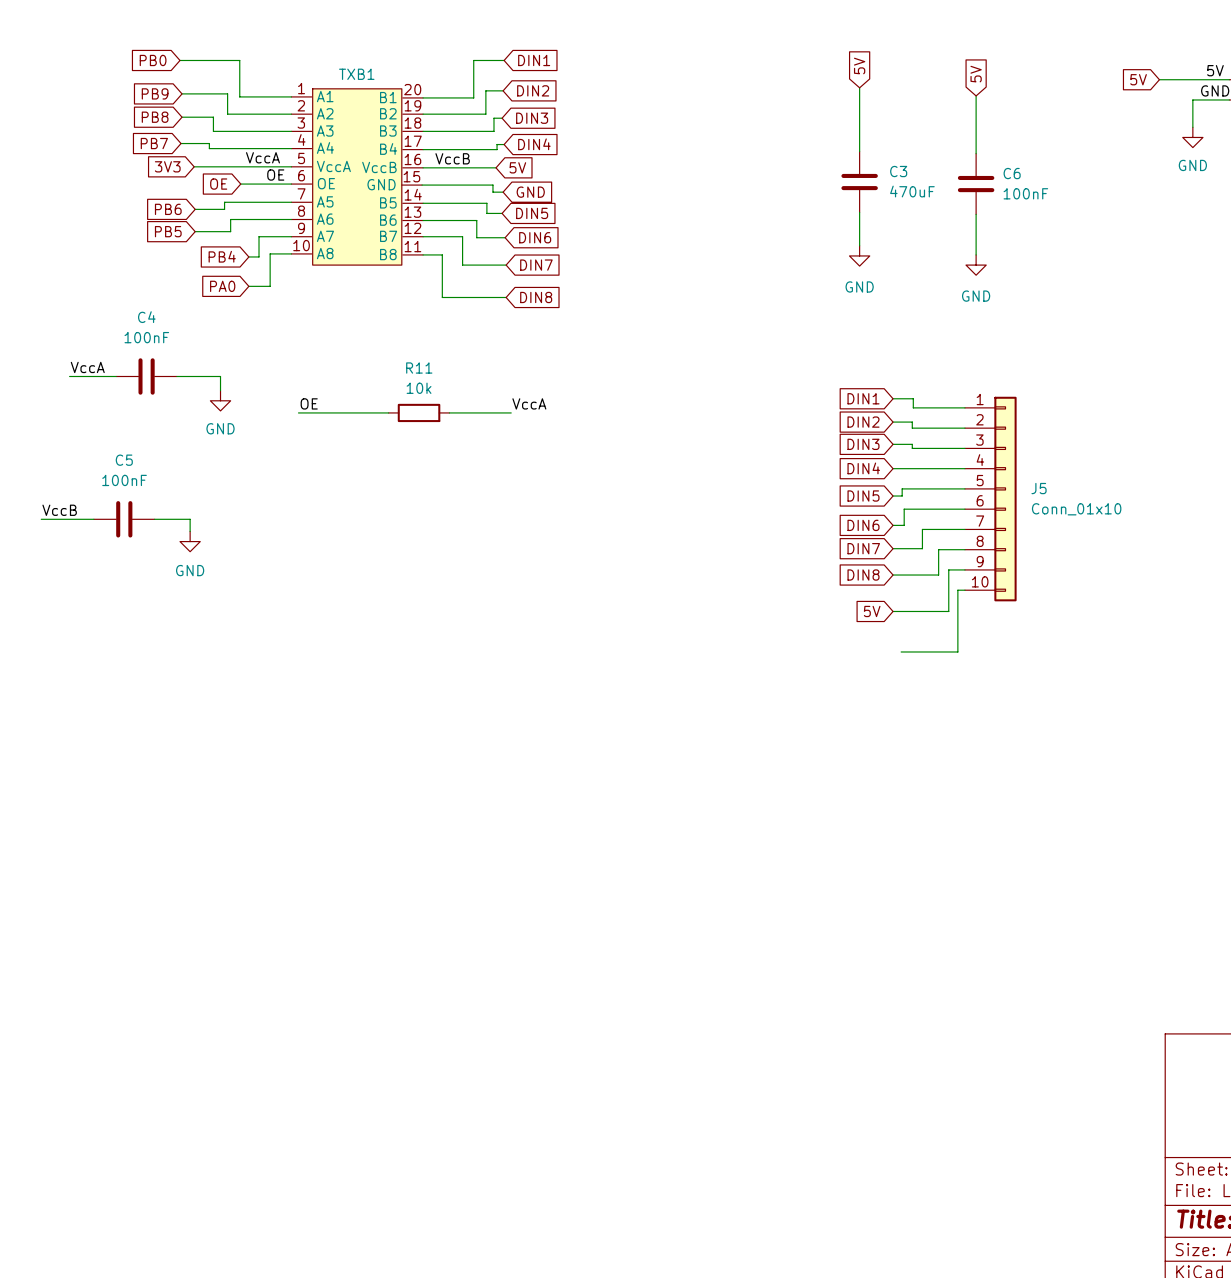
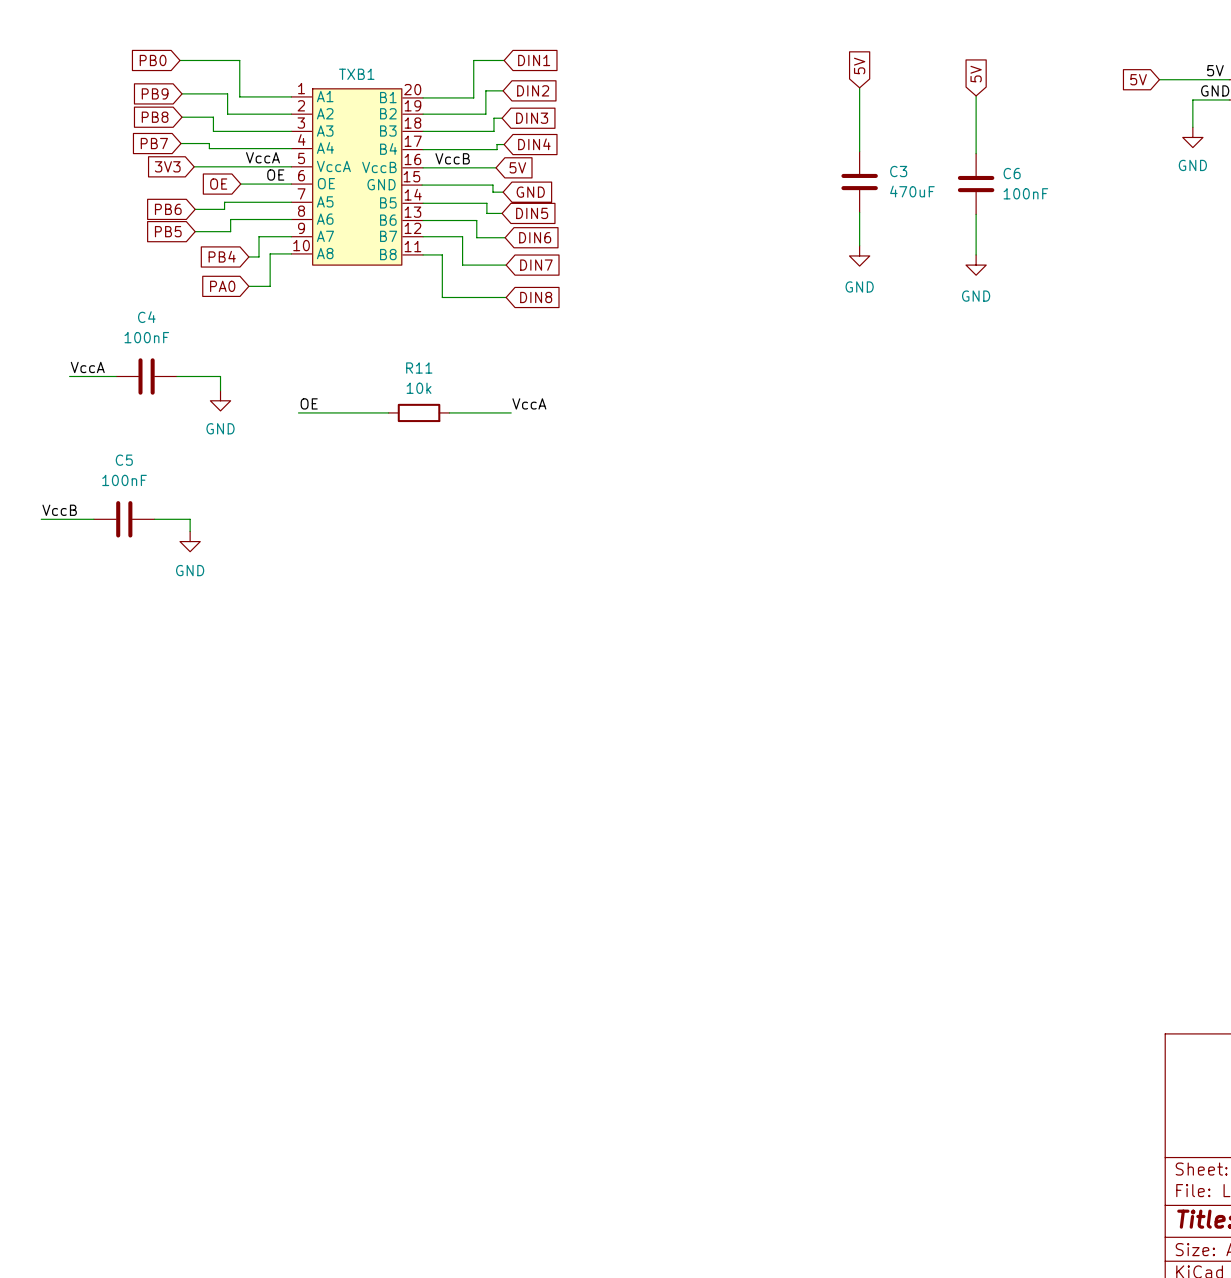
global label: DIN1 (863, 398) -> none
wire: (893, 398) (913, 398) (913, 407) (964, 407) -> none
global label: DIN2 (863, 422) -> none
wire: (893, 422) (912, 422) (912, 428) (964, 428) -> none
global label: DIN3 (863, 444) -> none
wire: (893, 444) (912, 444) (912, 448) (964, 448) -> none
global label: DIN4 (863, 468) -> none
wire: (893, 468) (964, 468) -> none
wire: (964, 488) (902, 488) (902, 496) (893, 496) -> none
global label: DIN5 (863, 496) -> none
J5: Conn_01x10 (990, 499) -> none
wire: (964, 509) (904, 509) (904, 525) (893, 525) -> none
global label: DIN6 (863, 525) -> none
wire: (964, 529) (922, 529) (922, 548) (893, 548) -> none
global label: DIN7 (863, 548) -> none
wire: (964, 549) (938, 549) (938, 575) (893, 575) -> none
wire: (964, 569) (948, 569) (948, 611) (893, 611) -> none
global label: DIN8 (863, 575) -> none
wire: (964, 590) (957, 590) (957, 651) (901, 651) -> none
global label: 5V (872, 611) -> none

